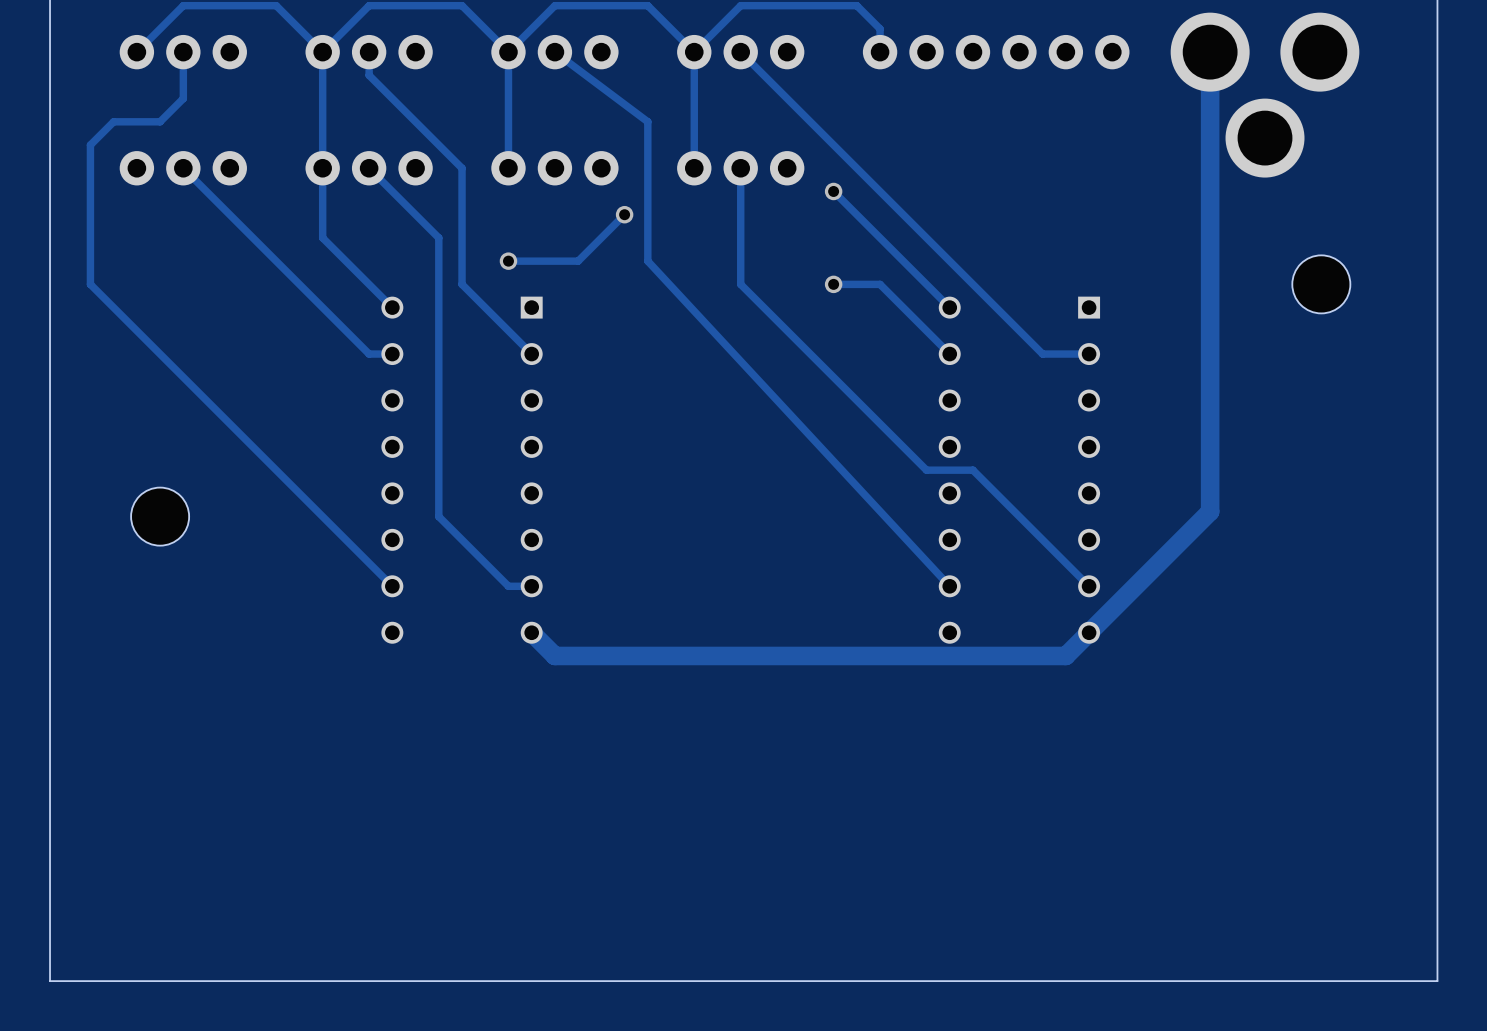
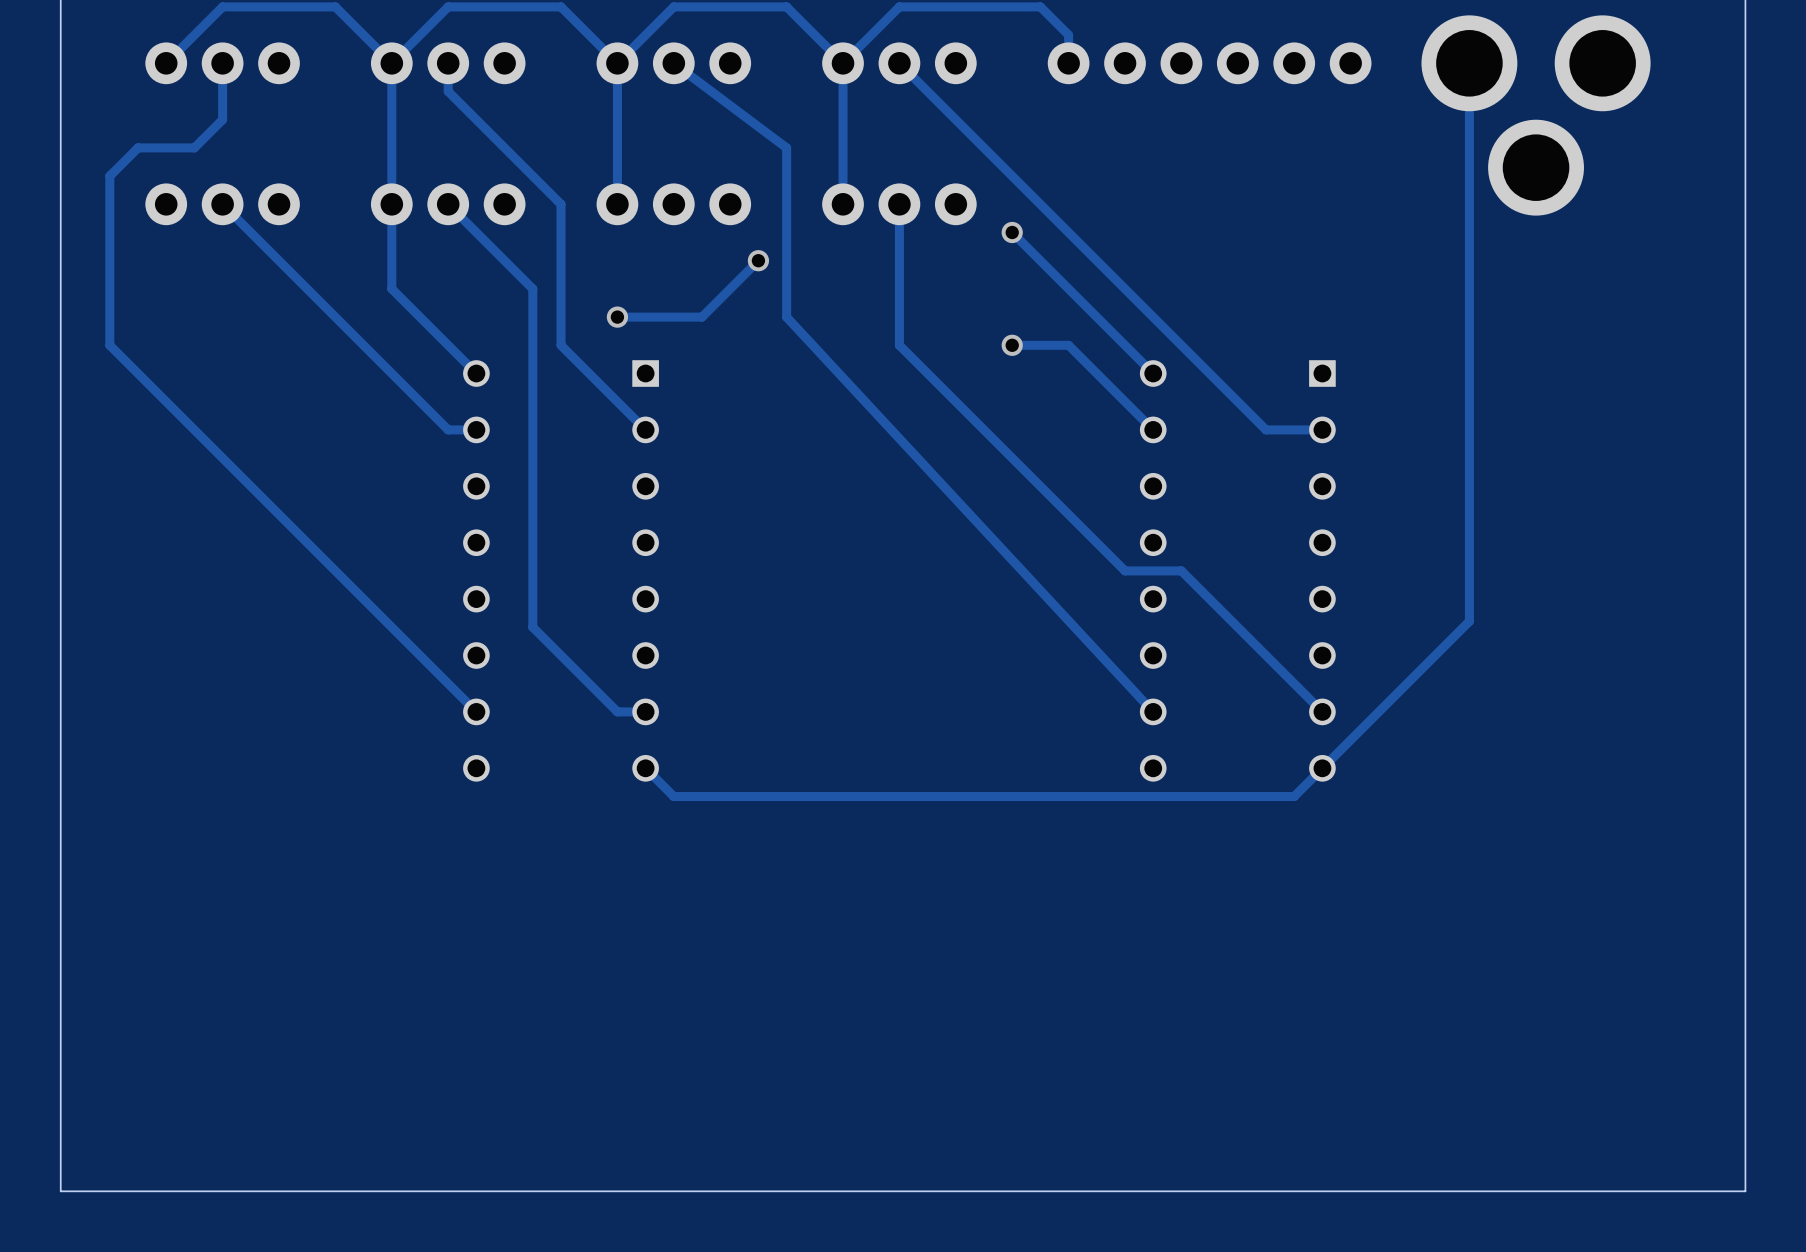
track width: thick (1210, 52) (1210, 511) (1065, 655) (554, 655) (531, 632) -> thin (1469, 63) (1469, 621) (1294, 796) (673, 796) (645, 768)
hole: (1321, 284) -> none
hole: (160, 516) -> none

